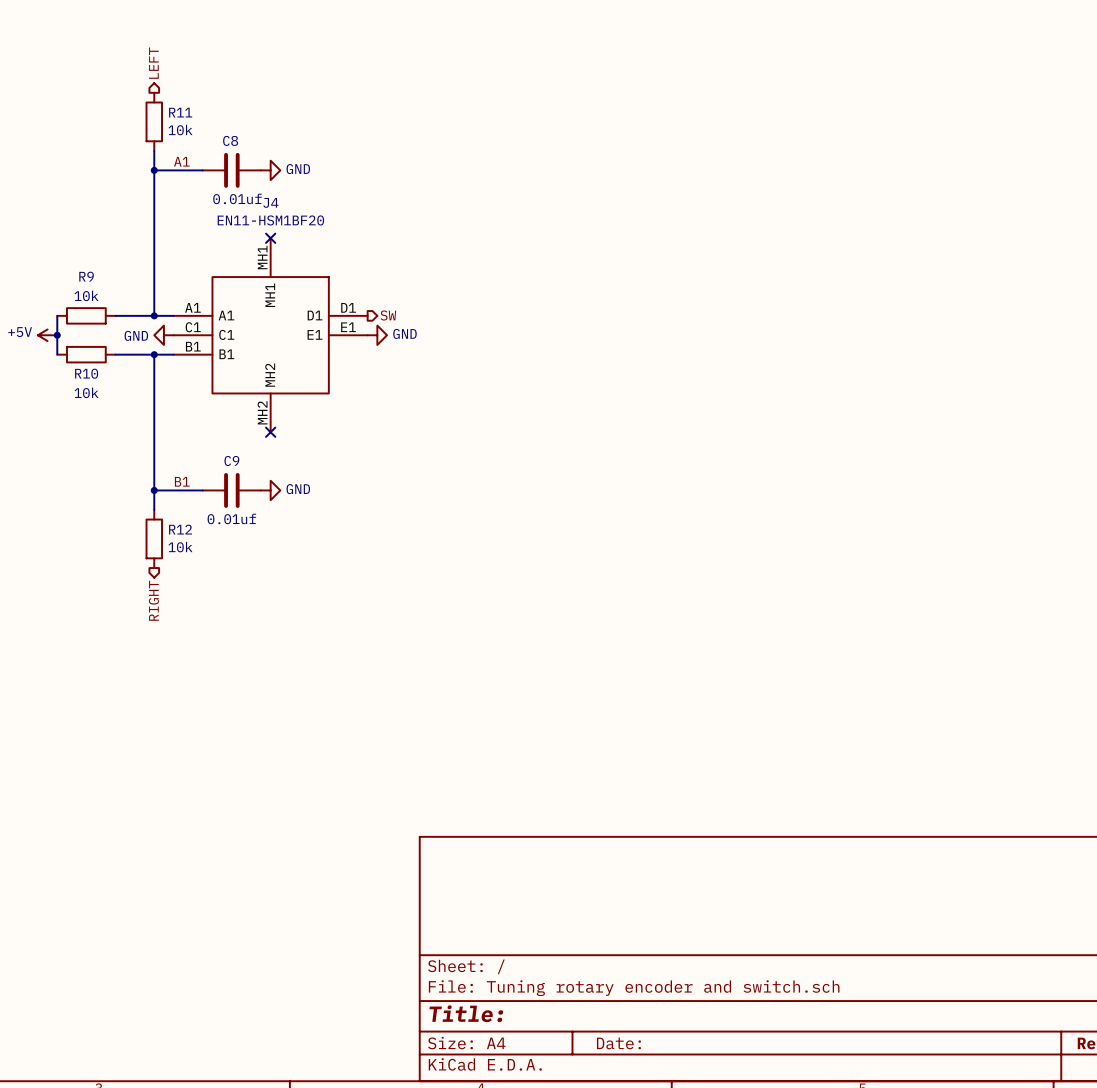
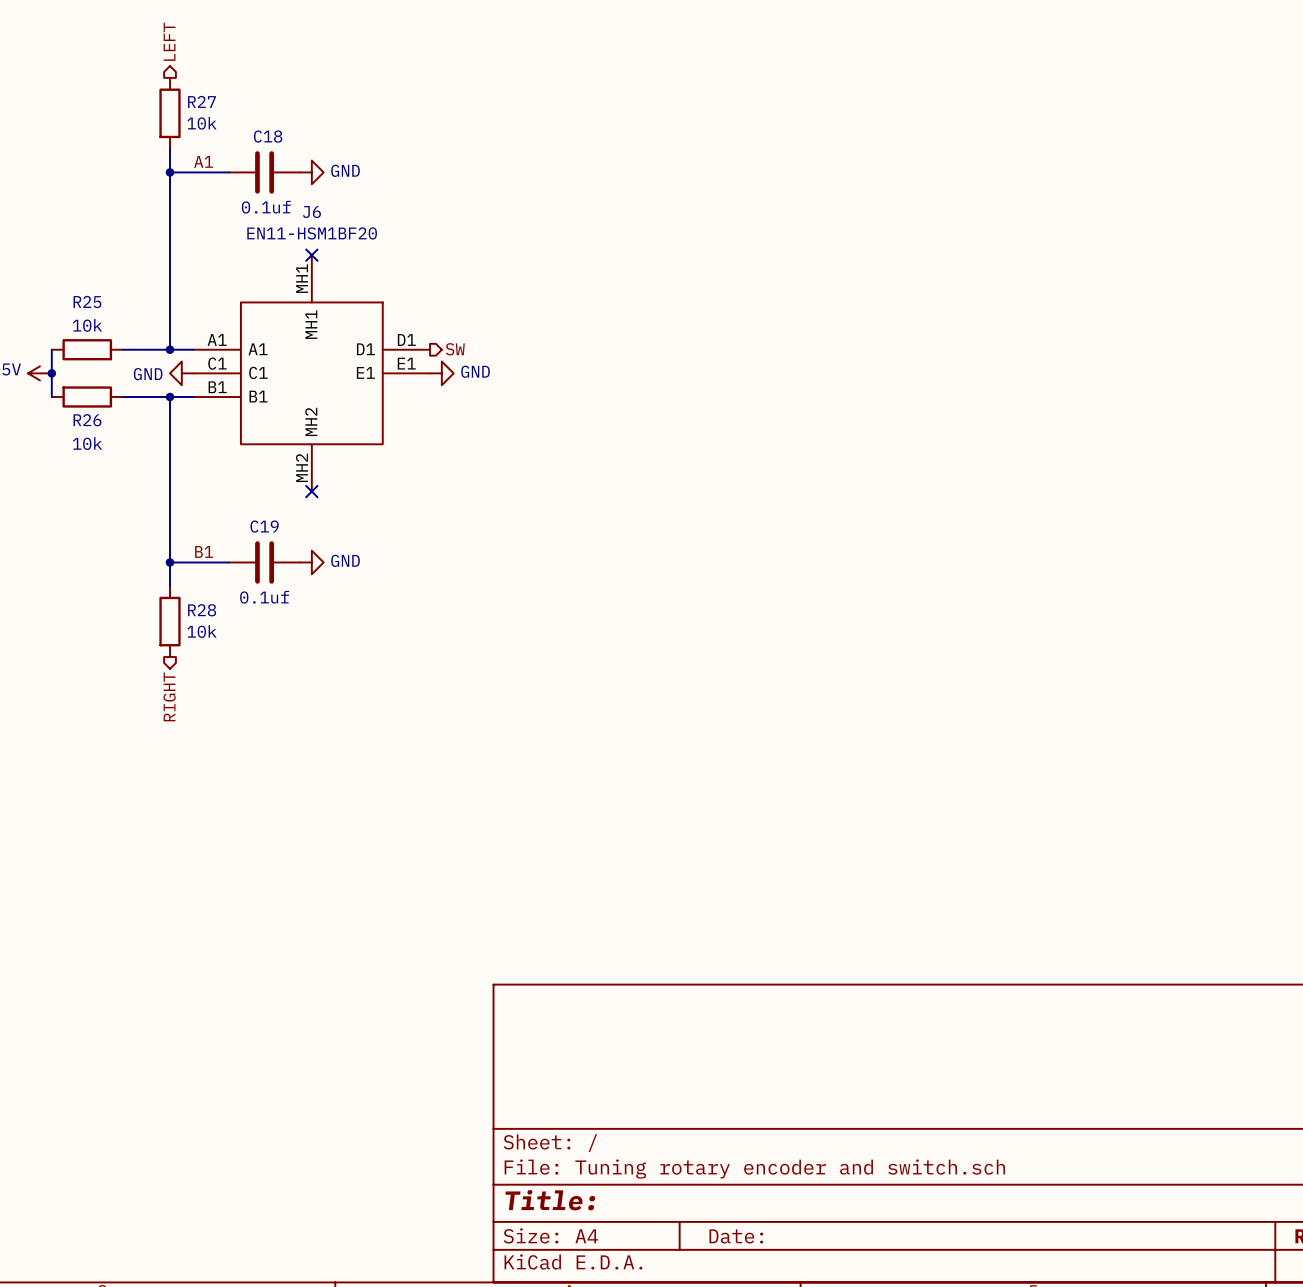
R11 name: R11 (180, 112) -> R27 (201, 101)
C8 name: C8 (230, 140) -> C18 (268, 136)
C8 value: 0.01uf (237, 198) -> 0.1uf (266, 207)
J4 name: J4 (270, 202) -> J6 (311, 212)
R9 name: R9 (86, 276) -> R25 (87, 302)
R10 name: R10 (86, 373) -> R26 (87, 420)
C9 name: C9 (231, 460) -> C19 (264, 526)
C9 value: 0.01uf (231, 518) -> 0.1uf (264, 597)
R12 name: R12 (180, 529) -> R28 (202, 610)

